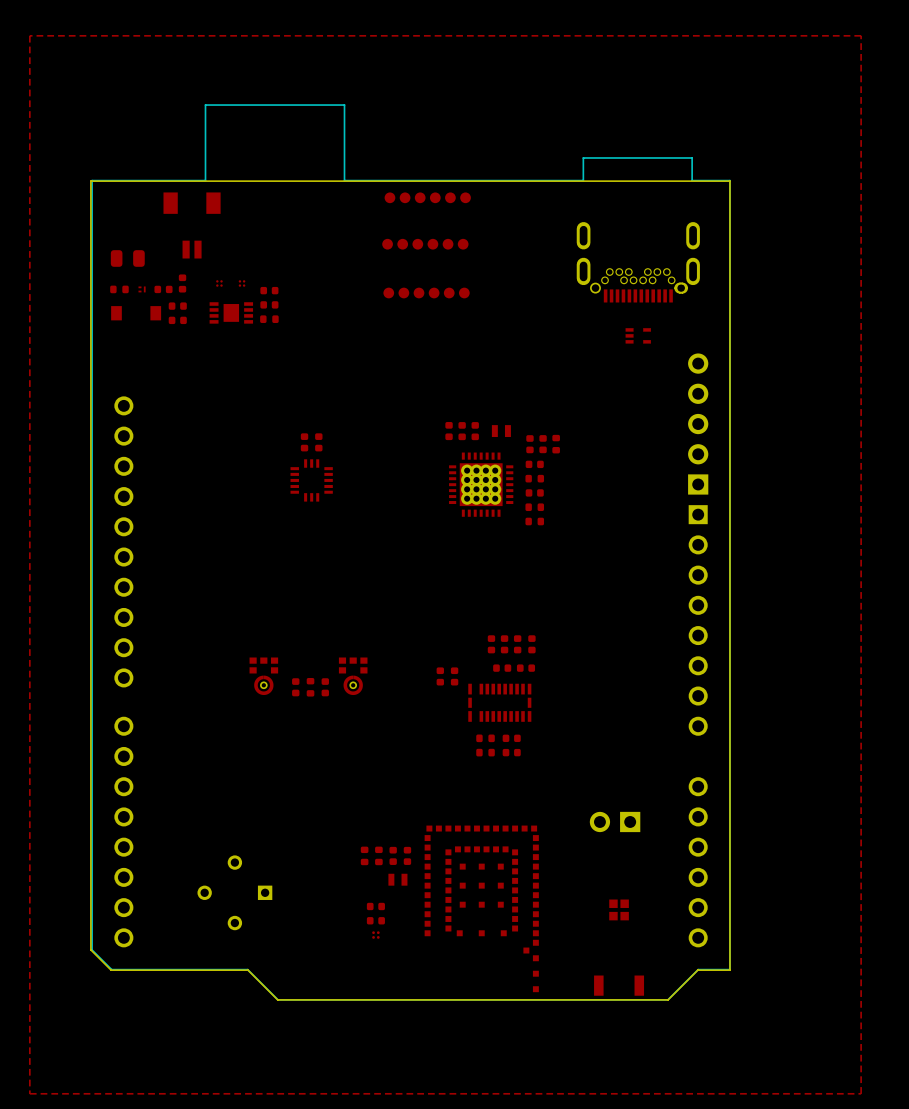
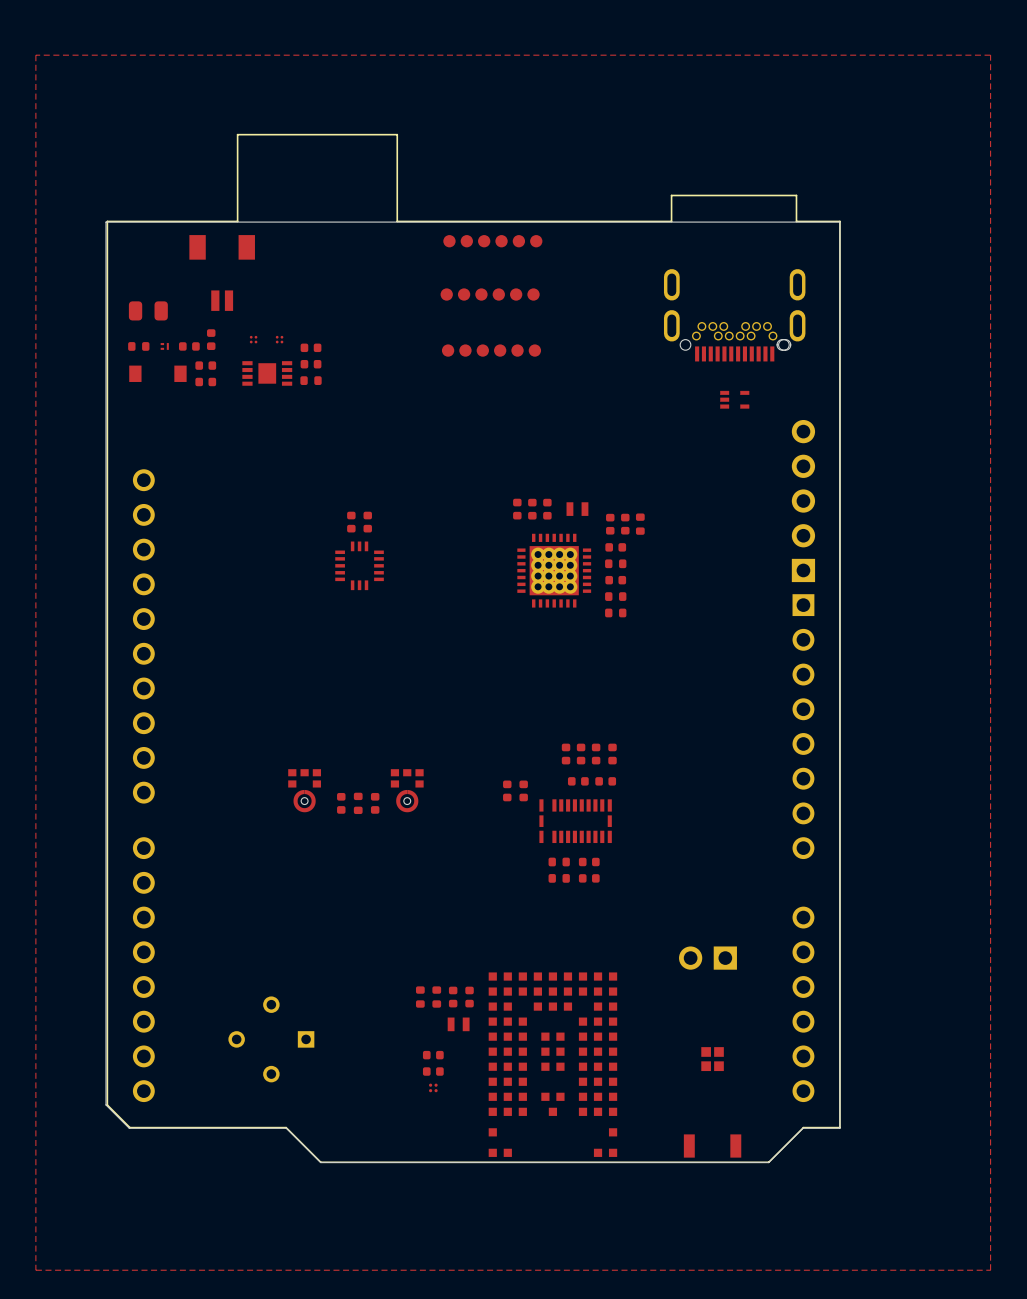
part footprint: [424, 825, 539, 993] -> [488, 972, 618, 1157]

